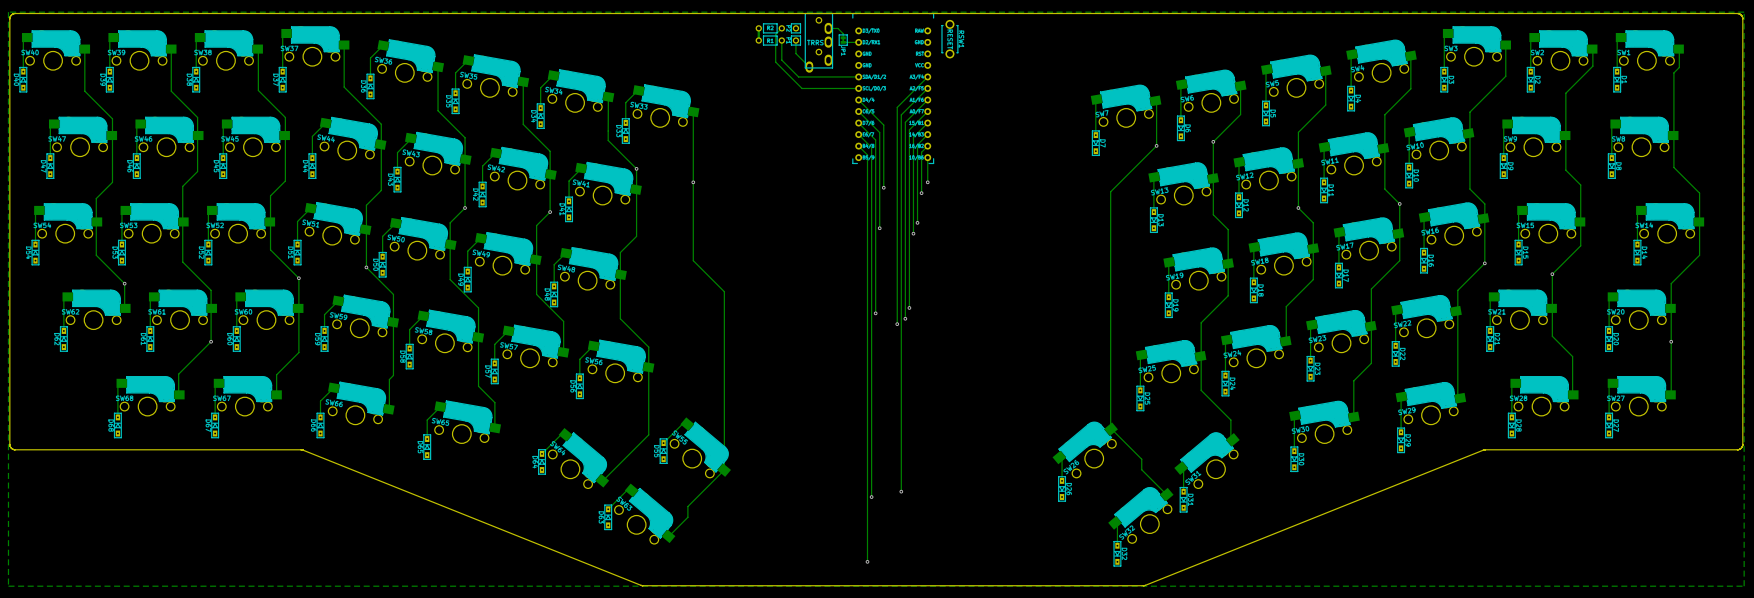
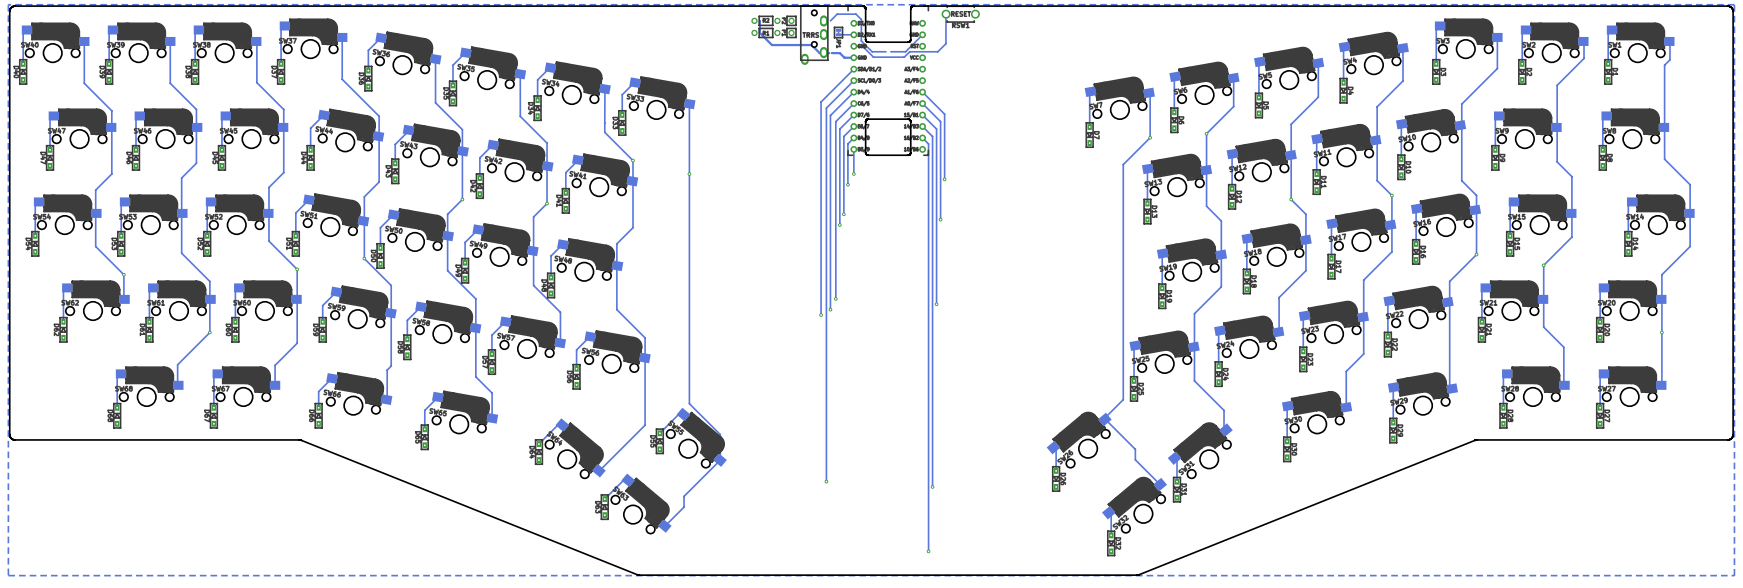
drawing shape: [9, 13, 1743, 586] -> [9, 5, 1734, 576]
track: none -> (945, 14) (945, 43) (937, 51) (909, 51) (904, 57) (873, 57) (862, 46) (853, 46)
track: (758, 28) (758, 40) -> none
track: none -> (759, 20) (759, 32) (771, 45) (811, 45) (819, 53) (829, 53)
track: (781, 28) (775, 34) (775, 62) (802, 88) (858, 88) -> (826, 481) (826, 108) (853, 80)
track: (828, 28) (837, 28) (843, 33) (843, 37) -> none
track: none -> (830, 20) (837, 14) (855, 14) (861, 19) (861, 41) (872, 51) (885, 51)
part rotation: 0° (949, 39) -> 90° clockwise (960, 14)
part position: (949, 39) -> (960, 14)
track: (781, 40) (781, 60) (798, 76) (858, 76) -> (821, 315) (821, 102) (853, 69)
track: (795, 40) (795, 53) (809, 67) -> none
track: none -> (922, 34) (905, 51) (890, 51)
track: none -> (831, 53) (839, 53) (844, 57) (853, 57)
track: (927, 76) (897, 107) (897, 324) -> none
track: (927, 88) (901, 114) (901, 491) -> none
track: (858, 100) (883, 125) (883, 187) -> (853, 92) (830, 115) (830, 309)
track: (927, 100) (905, 122) (905, 318) -> (922, 92) (944, 114) (944, 179)
track: (858, 111) (879, 132) (879, 228) -> (853, 103) (835, 121) (835, 298)
track: (927, 111) (909, 129) (909, 307) -> (922, 103) (940, 121) (940, 219)
track: (858, 123) (875, 140) (875, 313) -> (853, 115) (839, 129) (839, 225)
track: (927, 123) (913, 137) (913, 233) -> (922, 115) (936, 129) (936, 304)
track: (858, 134) (871, 147) (871, 497) -> (853, 126) (843, 136) (843, 214)
track: (927, 134) (917, 144) (917, 222) -> (922, 126) (932, 136) (932, 486)
track: (858, 146) (867, 154) (867, 561) -> (853, 137) (847, 143) (847, 184)
track: (927, 146) (921, 152) (921, 193) -> (922, 137) (928, 143) (928, 551)
track: (927, 157) (927, 182) -> (853, 149) (853, 174)
track: (1129, 172) (1110, 191) (1112, 429) -> (1123, 164) (1123, 399) (1104, 418)
via: none -> (853, 174)
via: (927, 182) -> none
via: (883, 187) -> none
via: none -> (944, 179)
via: none -> (847, 184)
via: (921, 193) -> none
via: none -> (843, 214)
via: (917, 222) -> none
via: (879, 228) -> none
via: none -> (940, 219)
via: none -> (839, 225)
via: (913, 233) -> none
track: (693, 260) (724, 291) (724, 444) -> (689, 251) (689, 403) (720, 434)
via: none -> (835, 298)
via: (909, 307) -> none
via: (875, 313) -> none
via: none -> (936, 304)
via: none -> (830, 309)
via: (905, 318) -> none
via: none -> (821, 315)
via: (897, 324) -> none
via: none -> (826, 481)
via: (901, 491) -> none
via: (871, 497) -> none
via: none -> (932, 486)
via: (867, 561) -> none
via: none -> (928, 551)

